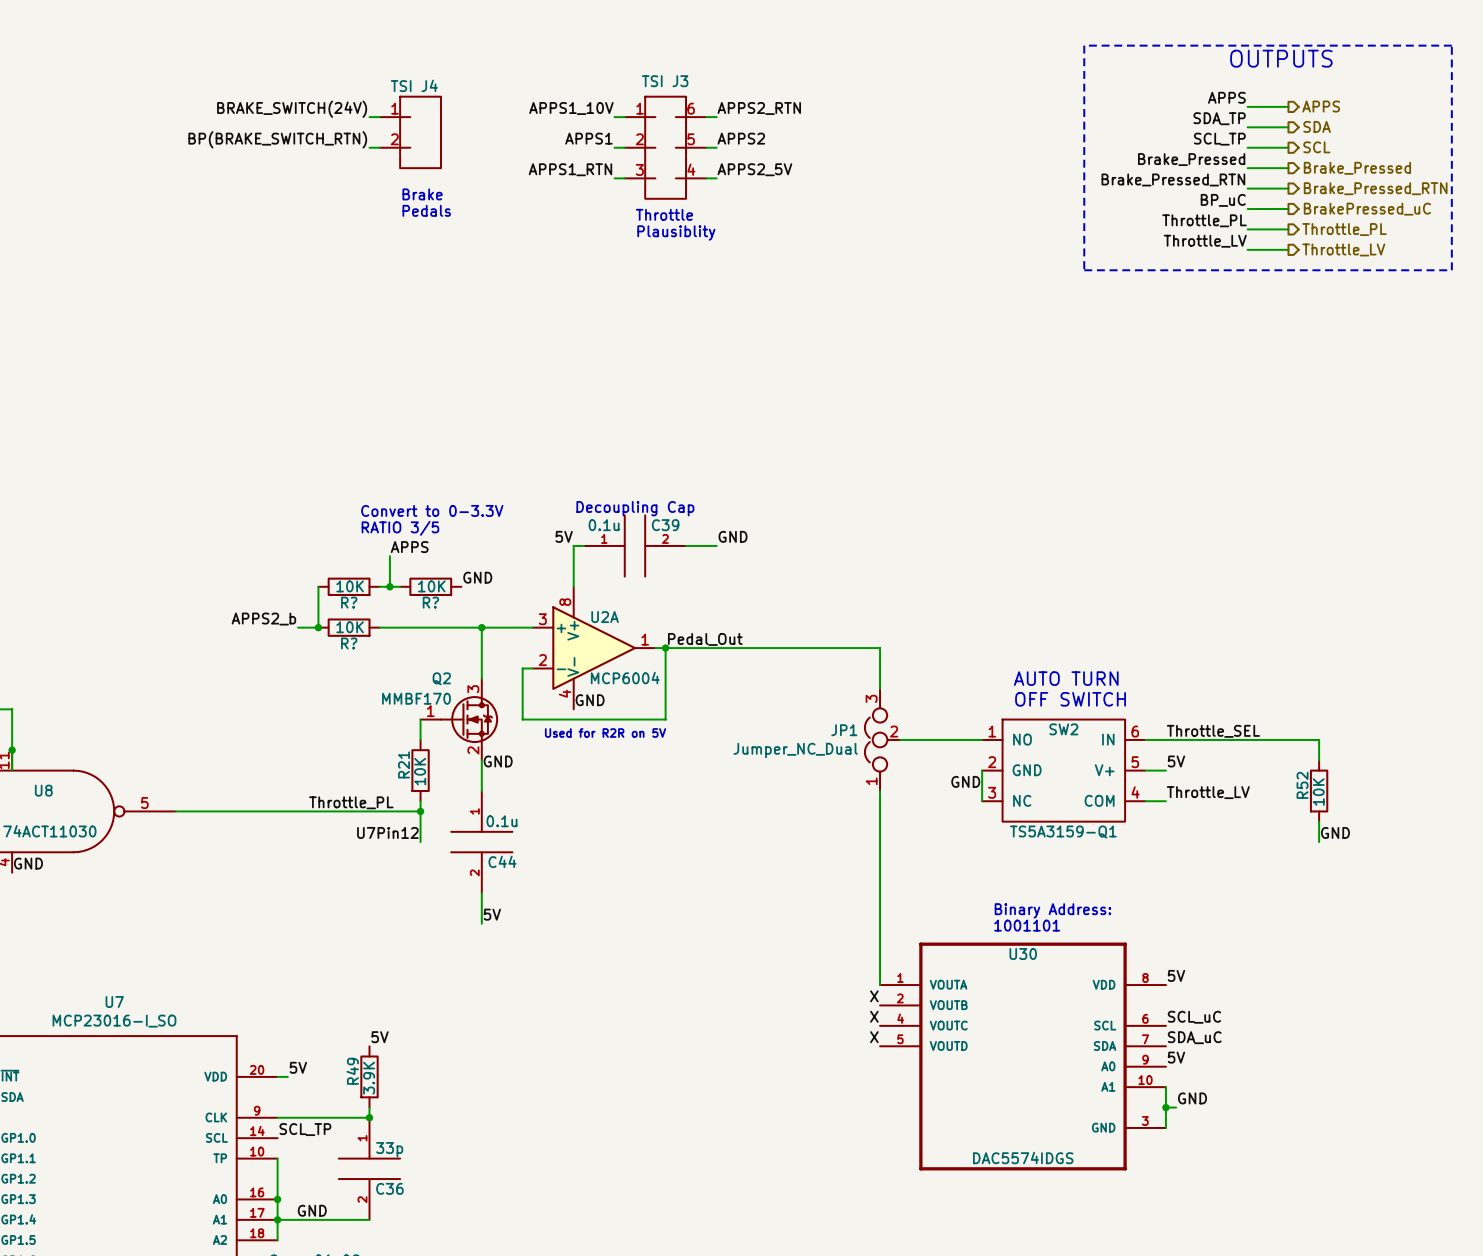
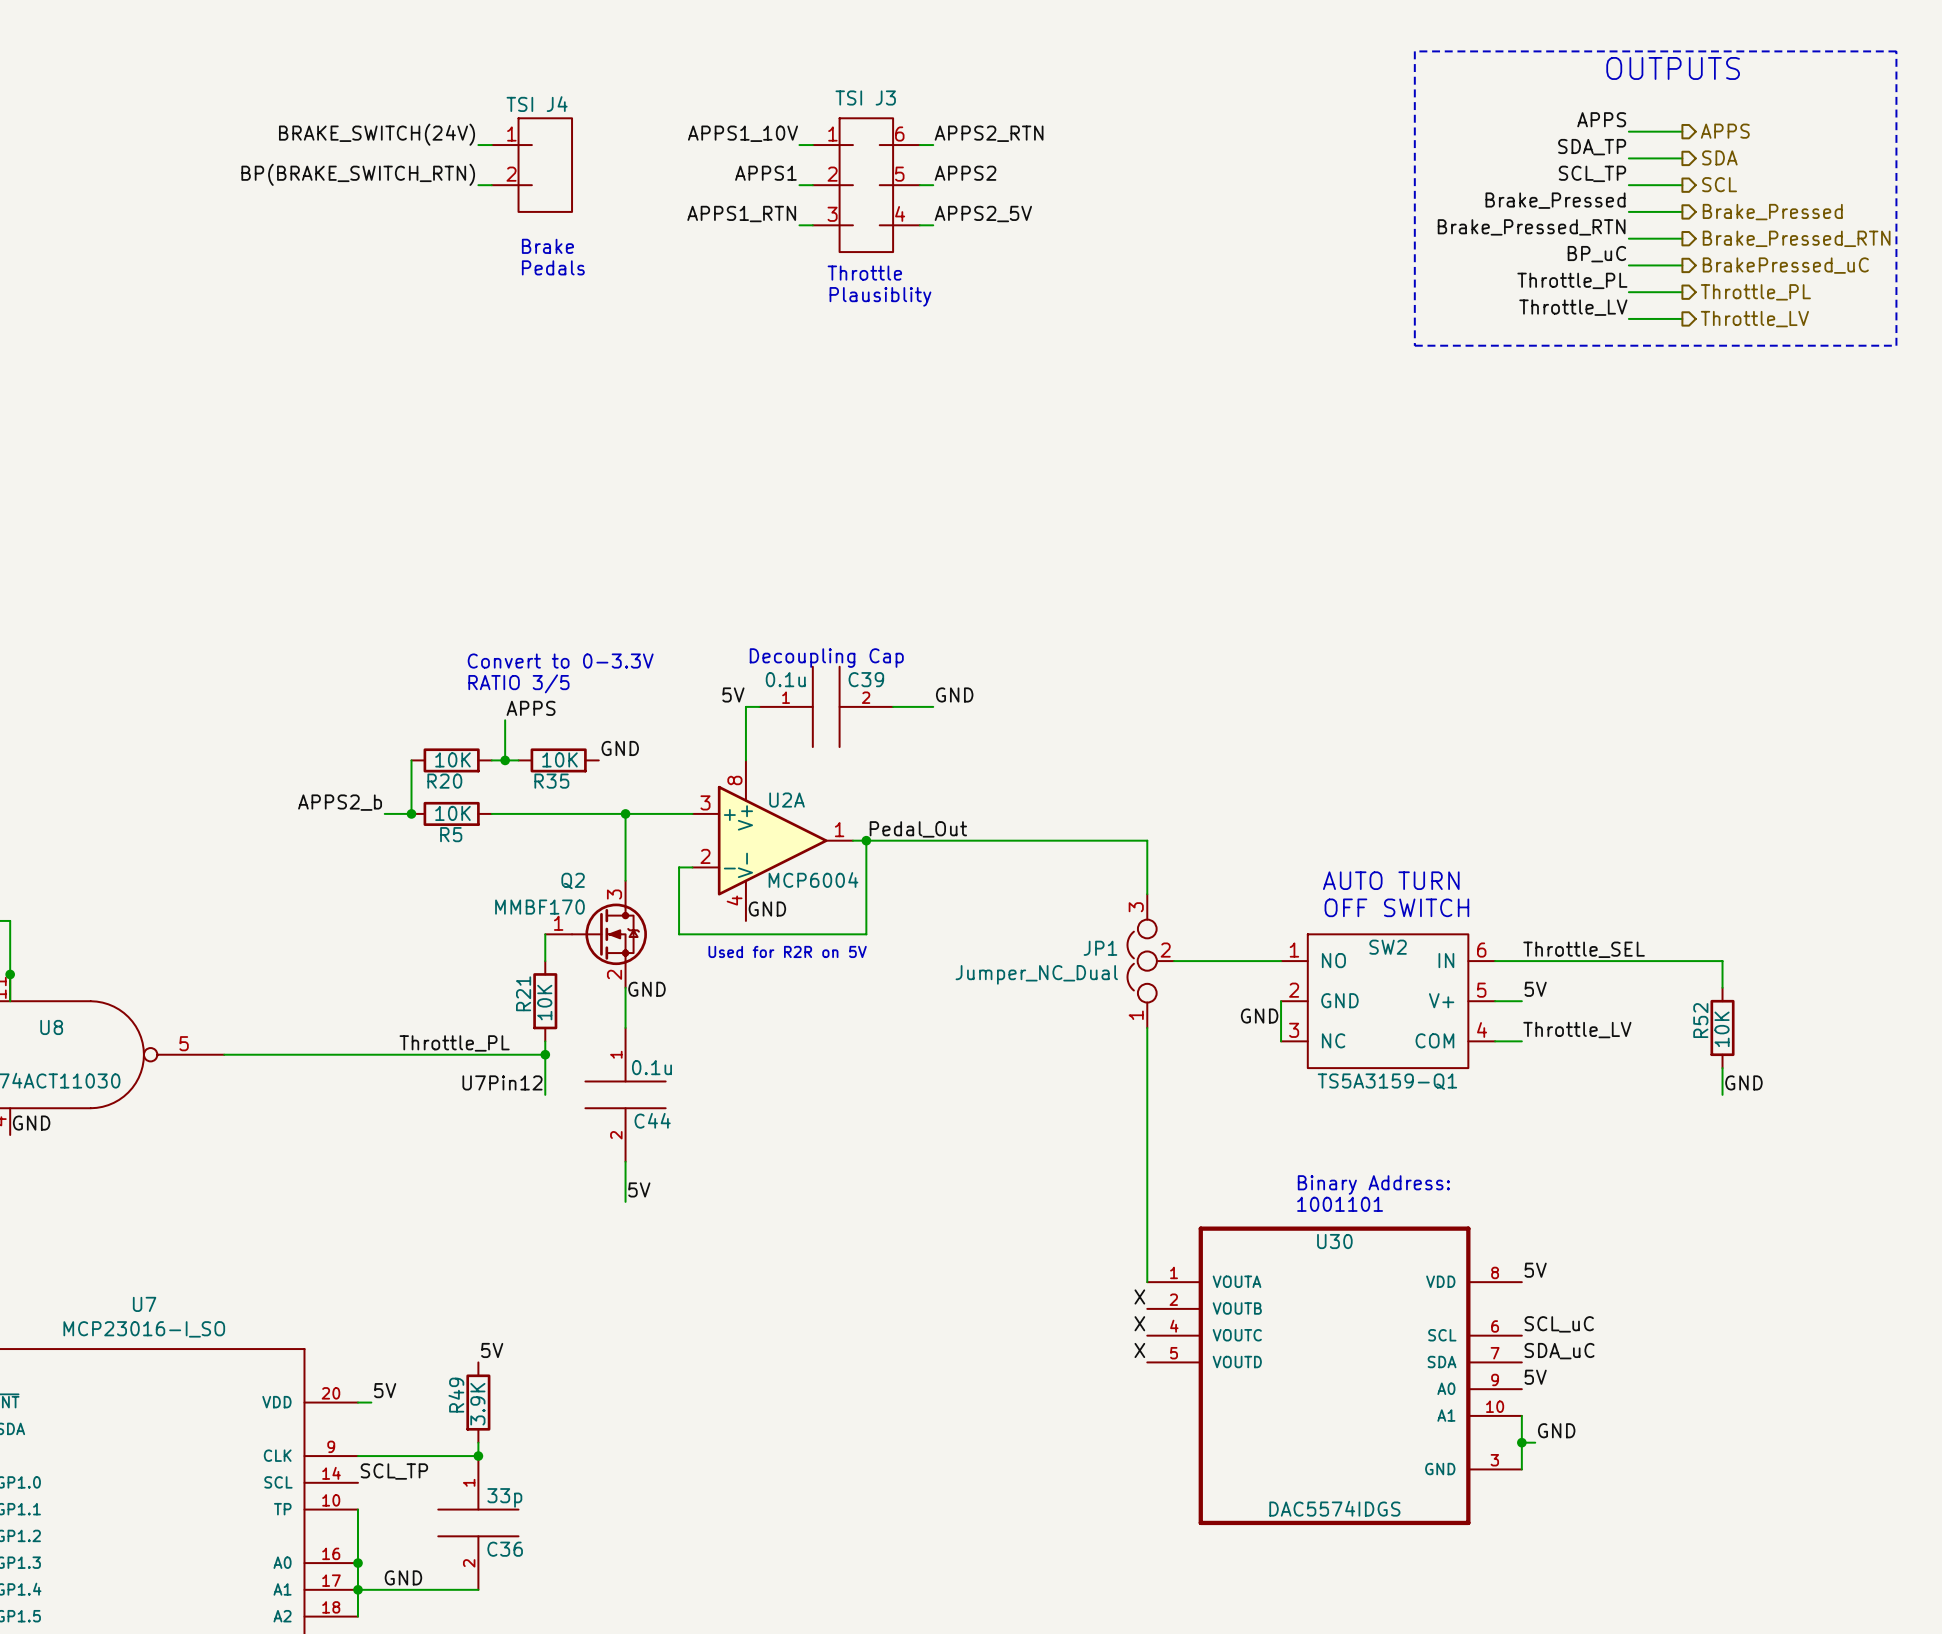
R? name: R? (349, 602) -> R20 (444, 781)
R? name: R? (430, 602) -> R35 (551, 781)
R? name: R? (349, 643) -> R5 (451, 834)

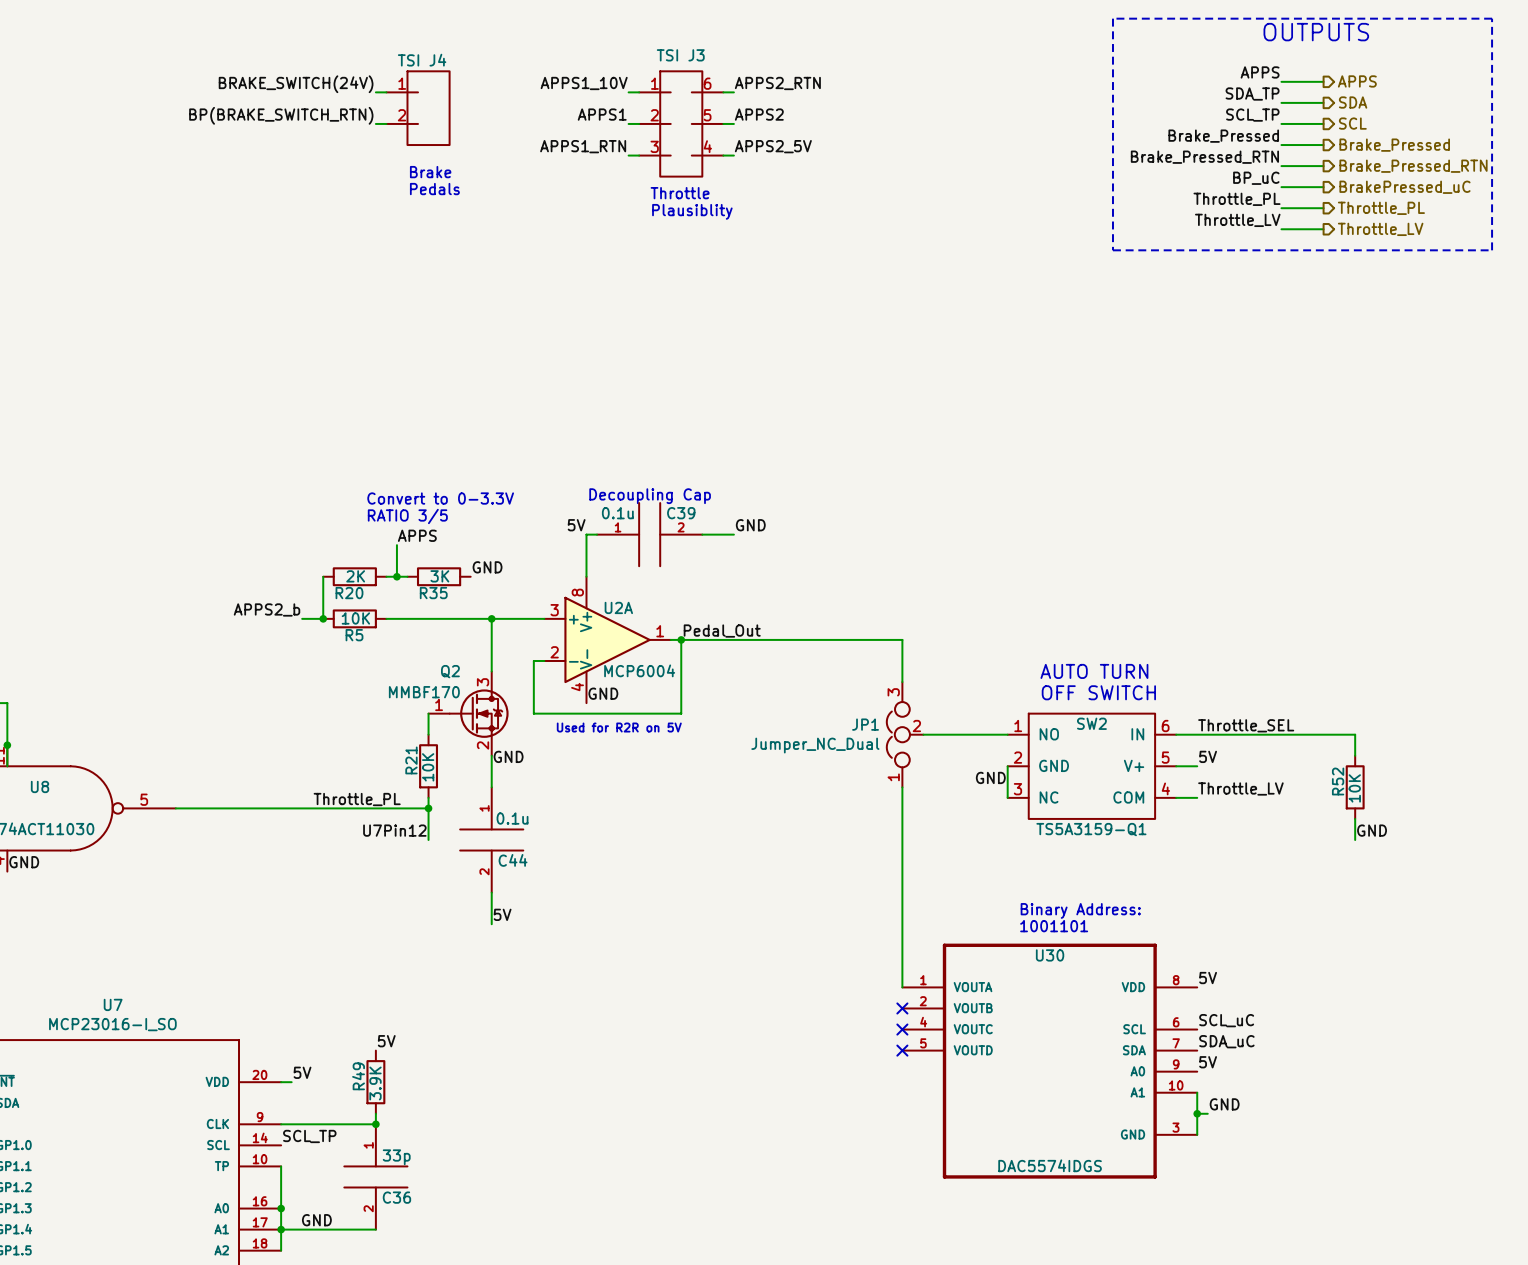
R20 value: 10K (452, 759) -> 2K (355, 576)
R35 value: 10K (559, 759) -> 3K (439, 576)
label: X (1139, 1296) -> none
no-connect mark: none -> (902, 1008)
label: X (1139, 1323) -> none
no-connect mark: none -> (902, 1029)
label: X (1139, 1350) -> none
no-connect mark: none -> (902, 1050)

